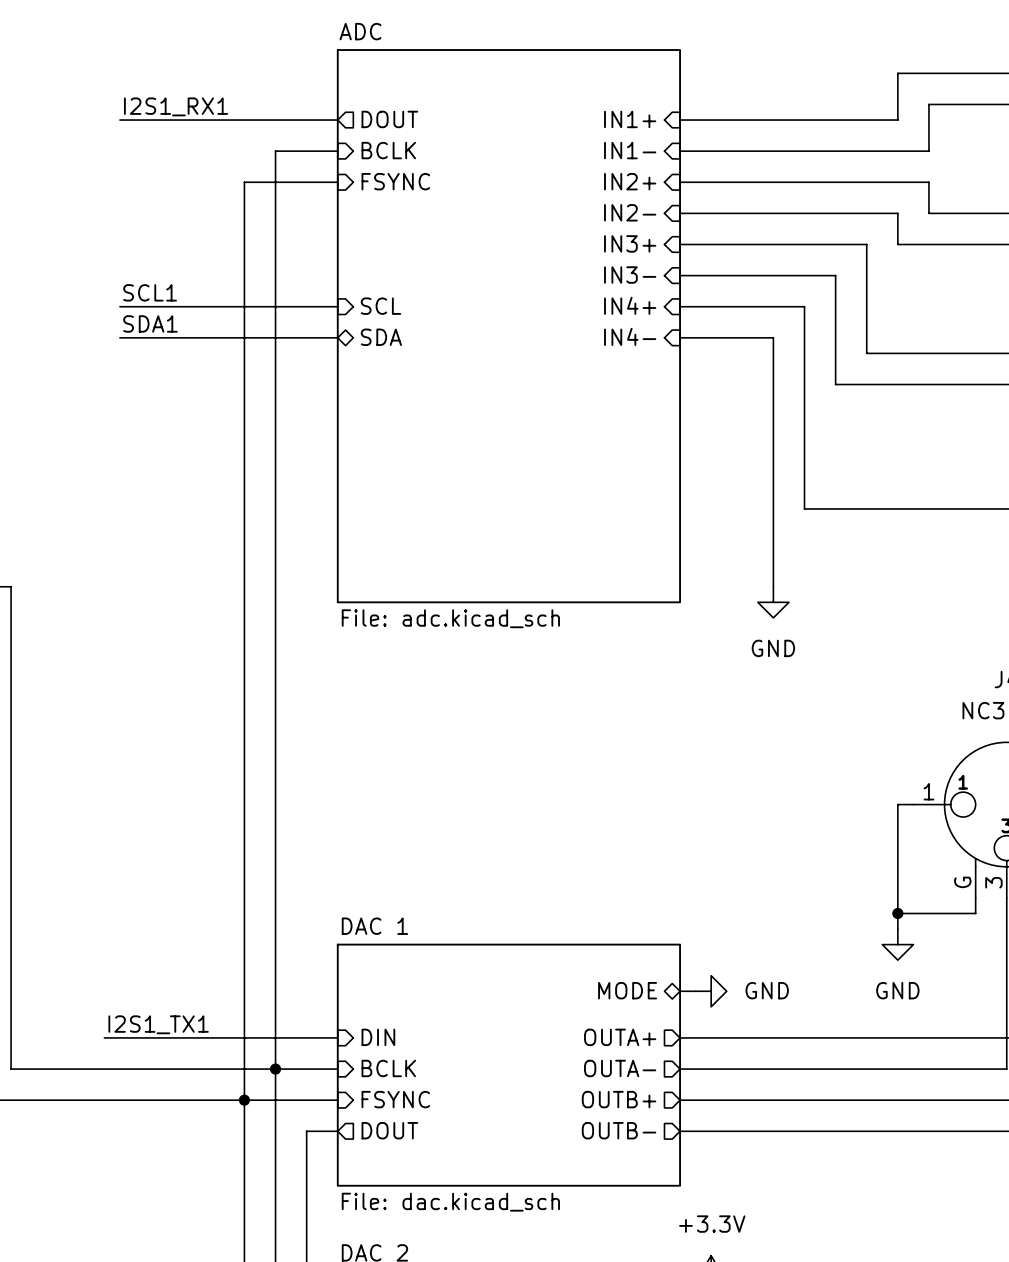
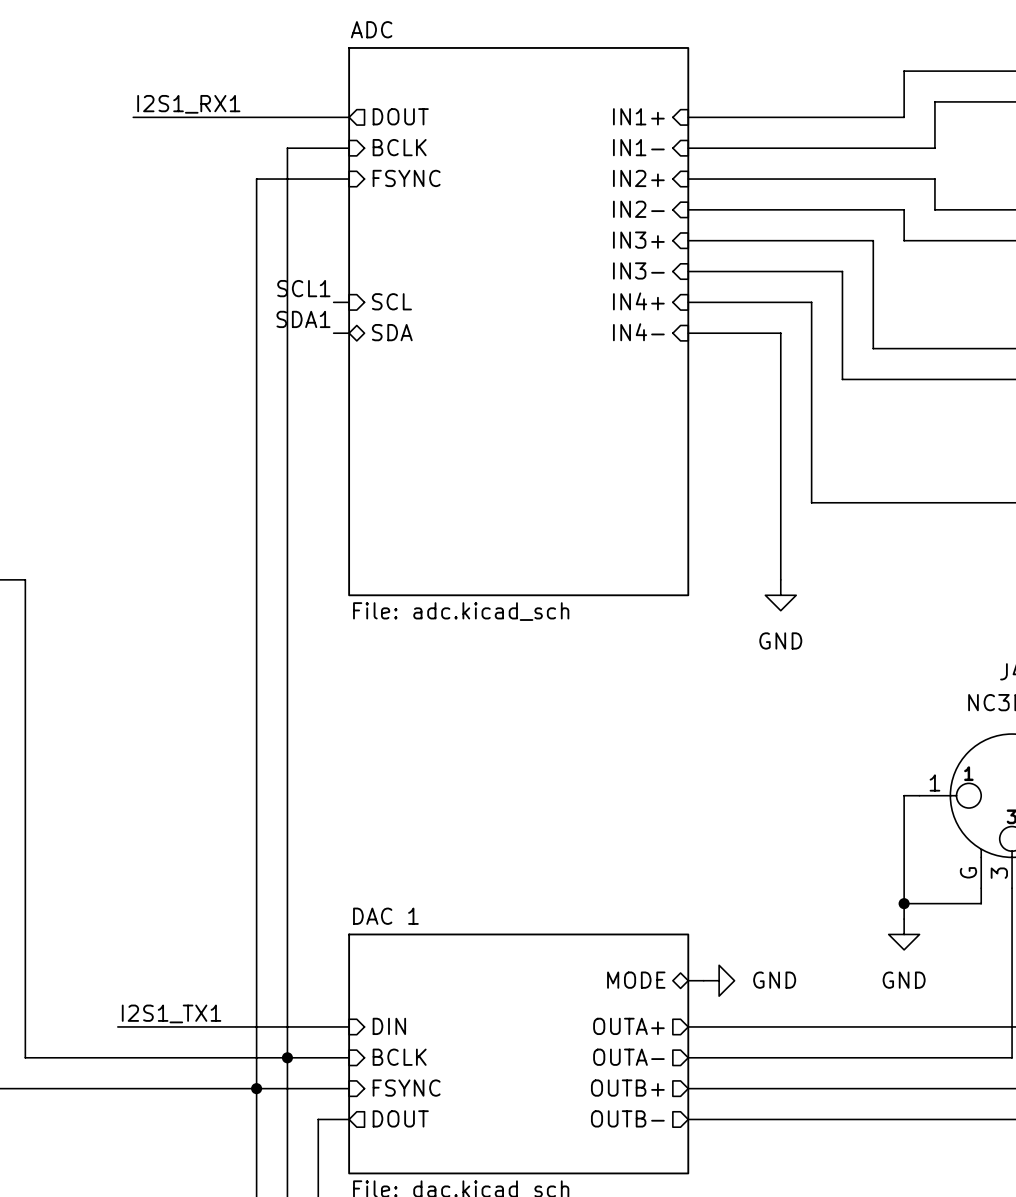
label position: SCL1 (150, 292) -> SCL1 (303, 288)
wire: (119, 306) (322, 306) -> none
label position: SDA1 (150, 323) -> SDA1 (303, 319)
wire: (119, 337) (322, 337) -> none

